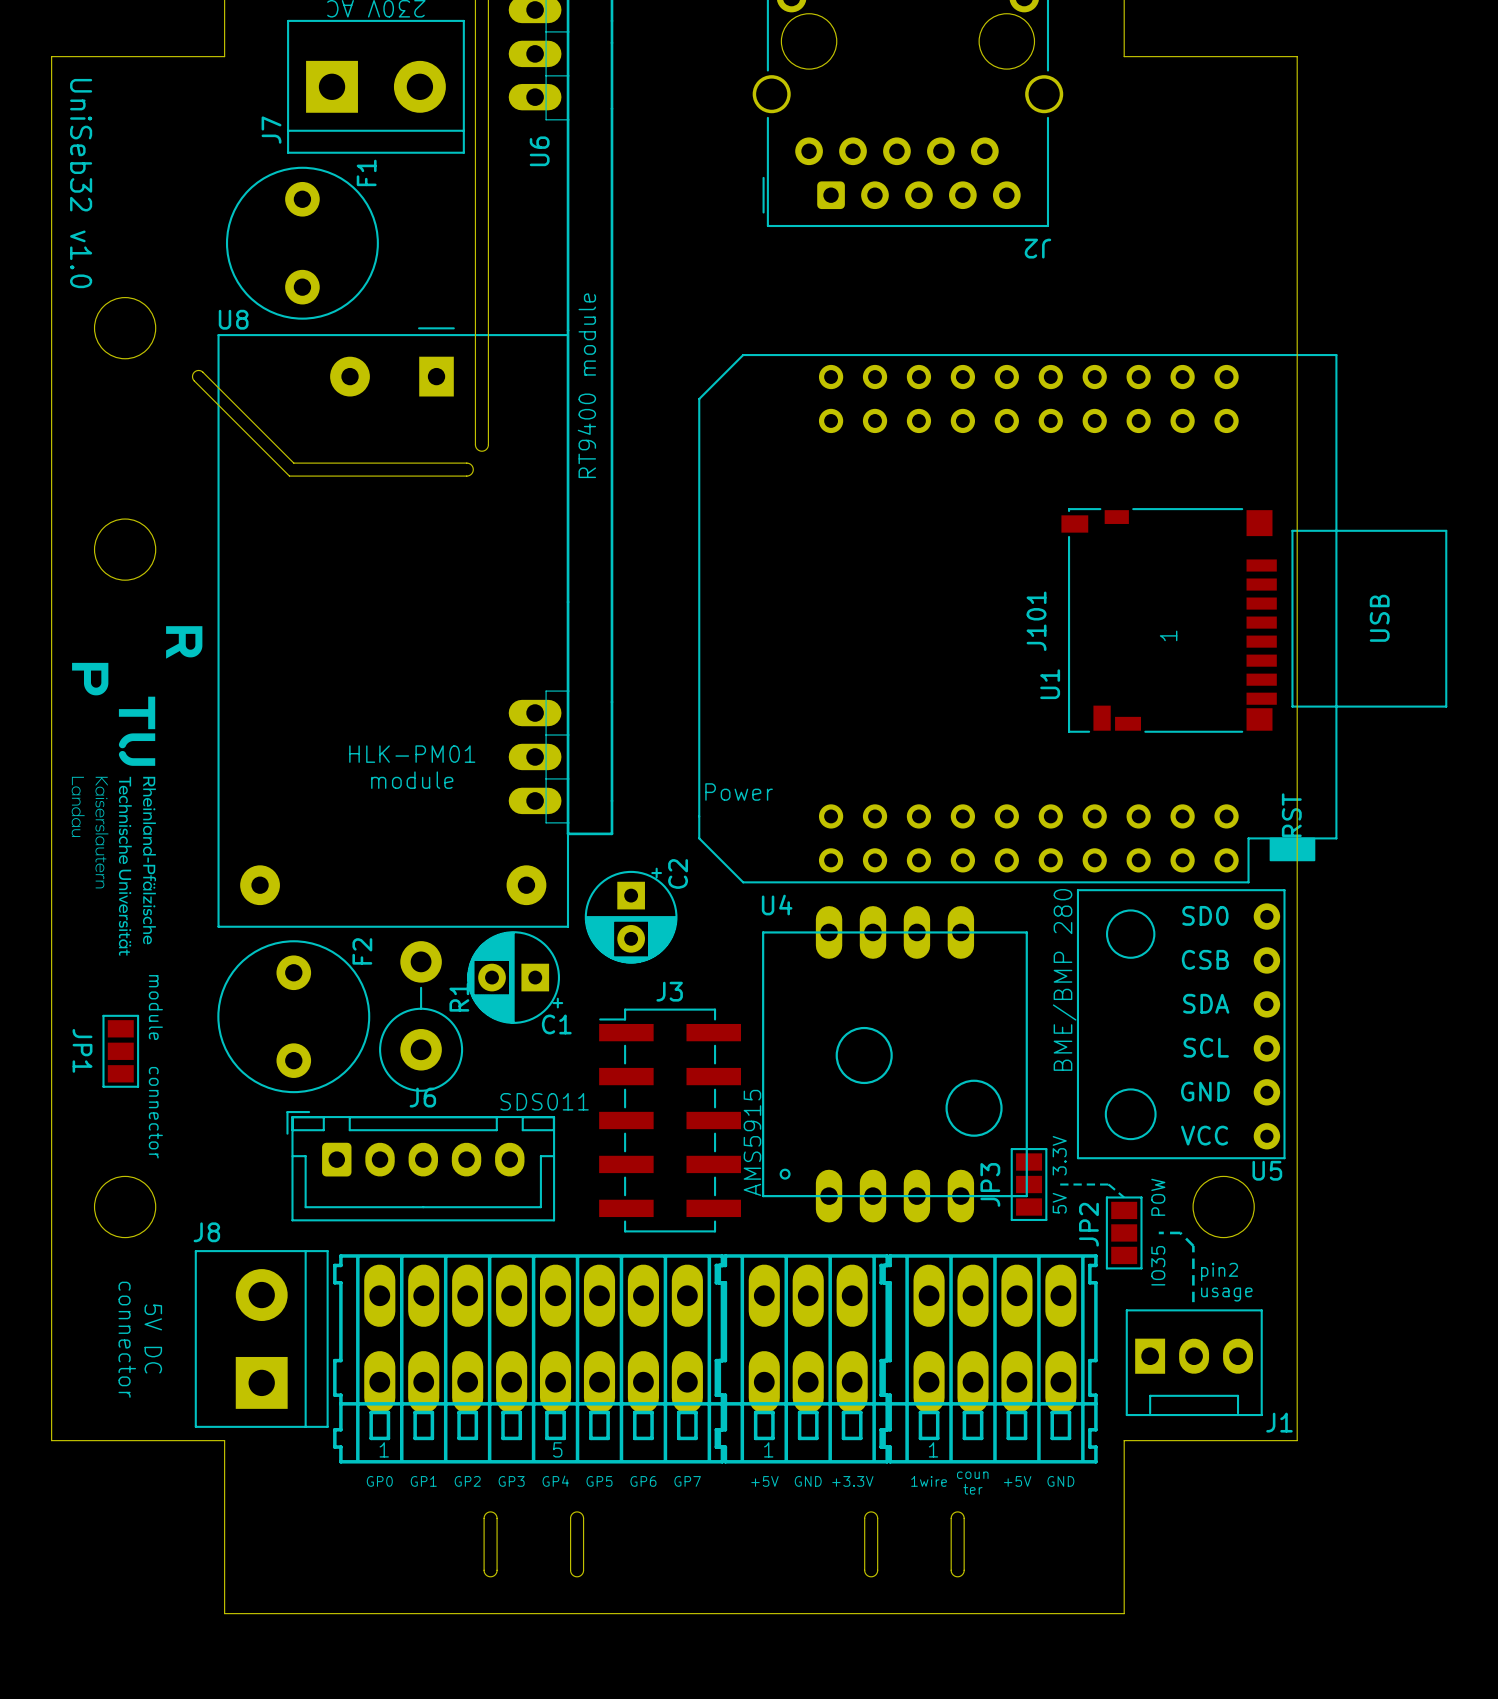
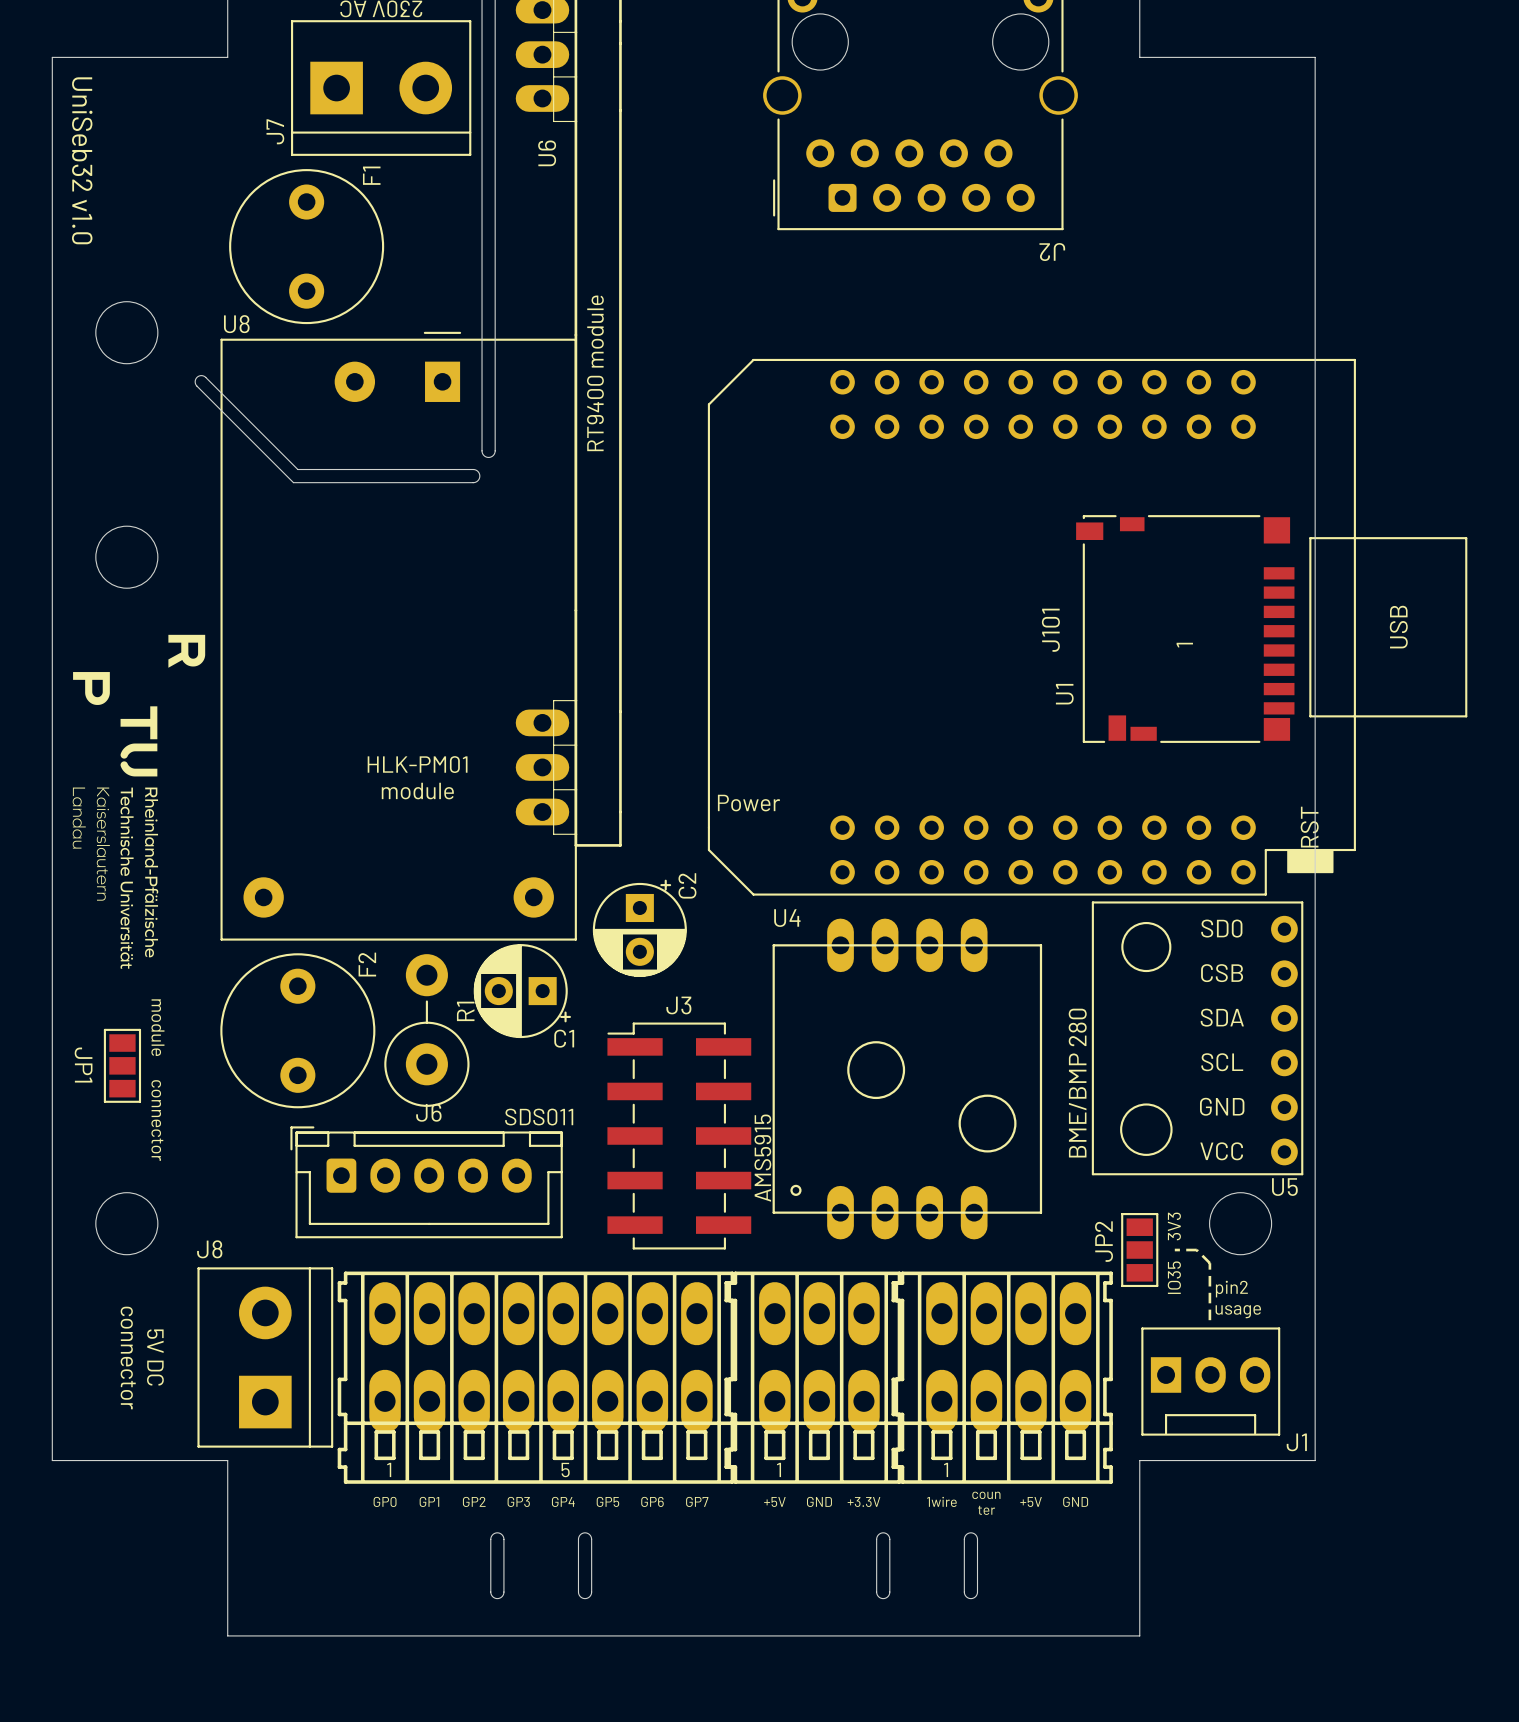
U5 text position: BME/BMP 280 (1064, 979) -> BME/BMP 280 (1077, 1083)
text: 3.3V (1059, 1155) -> none
JP3: (1029, 1184) -> none
line: (1060, 1184) (1108, 1184) (1124, 1197) -> none
text: POW (1158, 1197) -> 3V3 (1174, 1226)
text: 5V (1059, 1203) -> none

